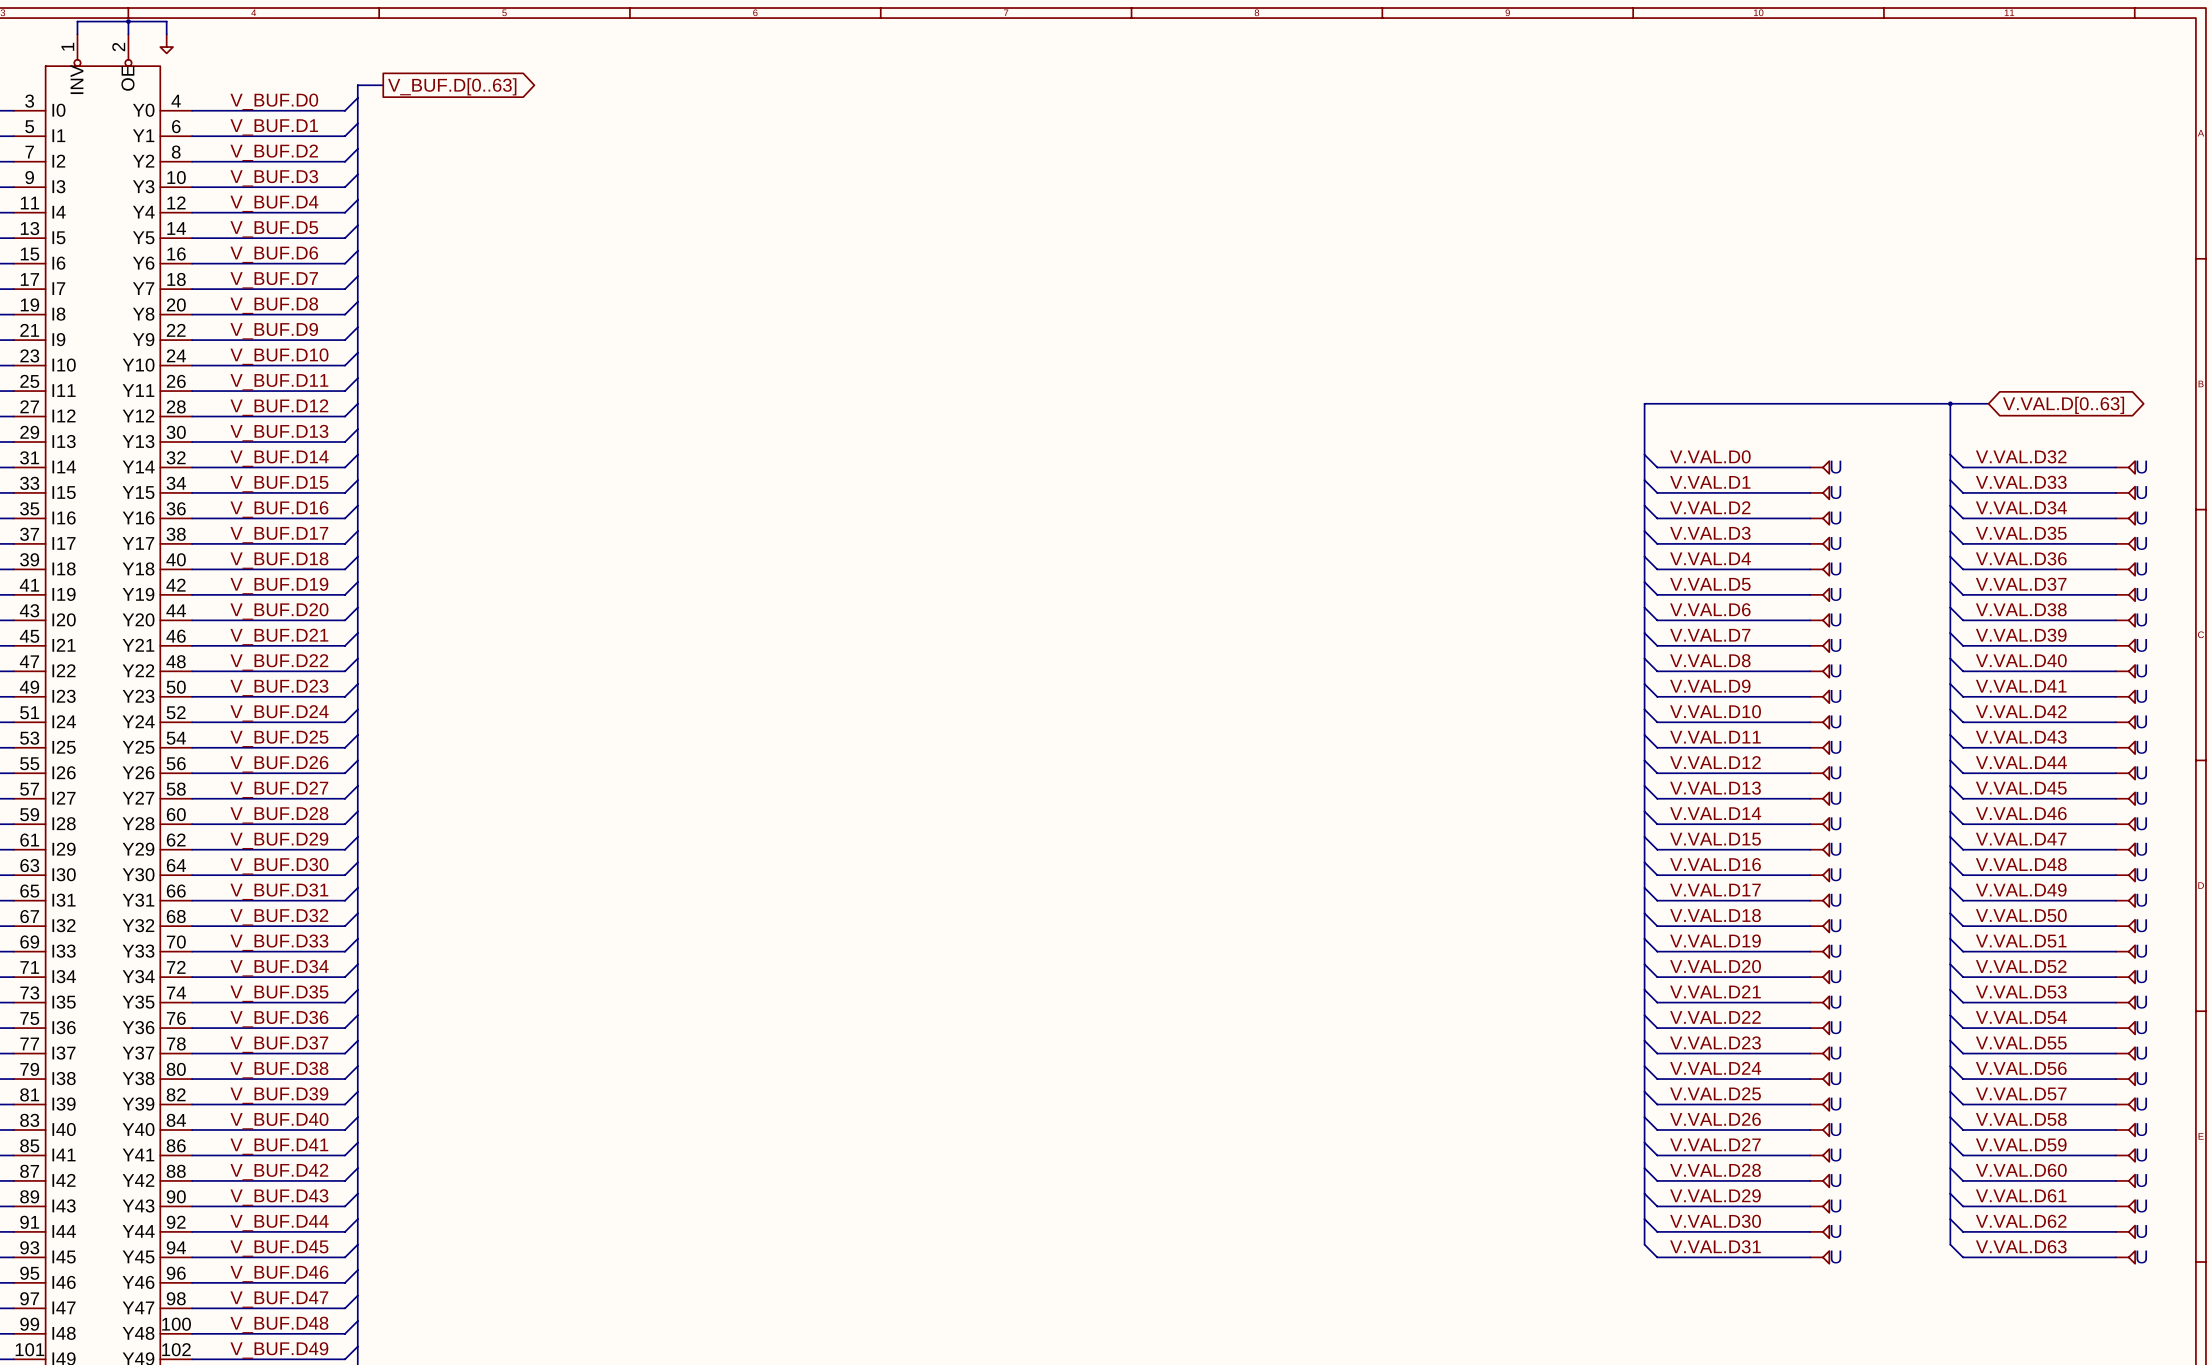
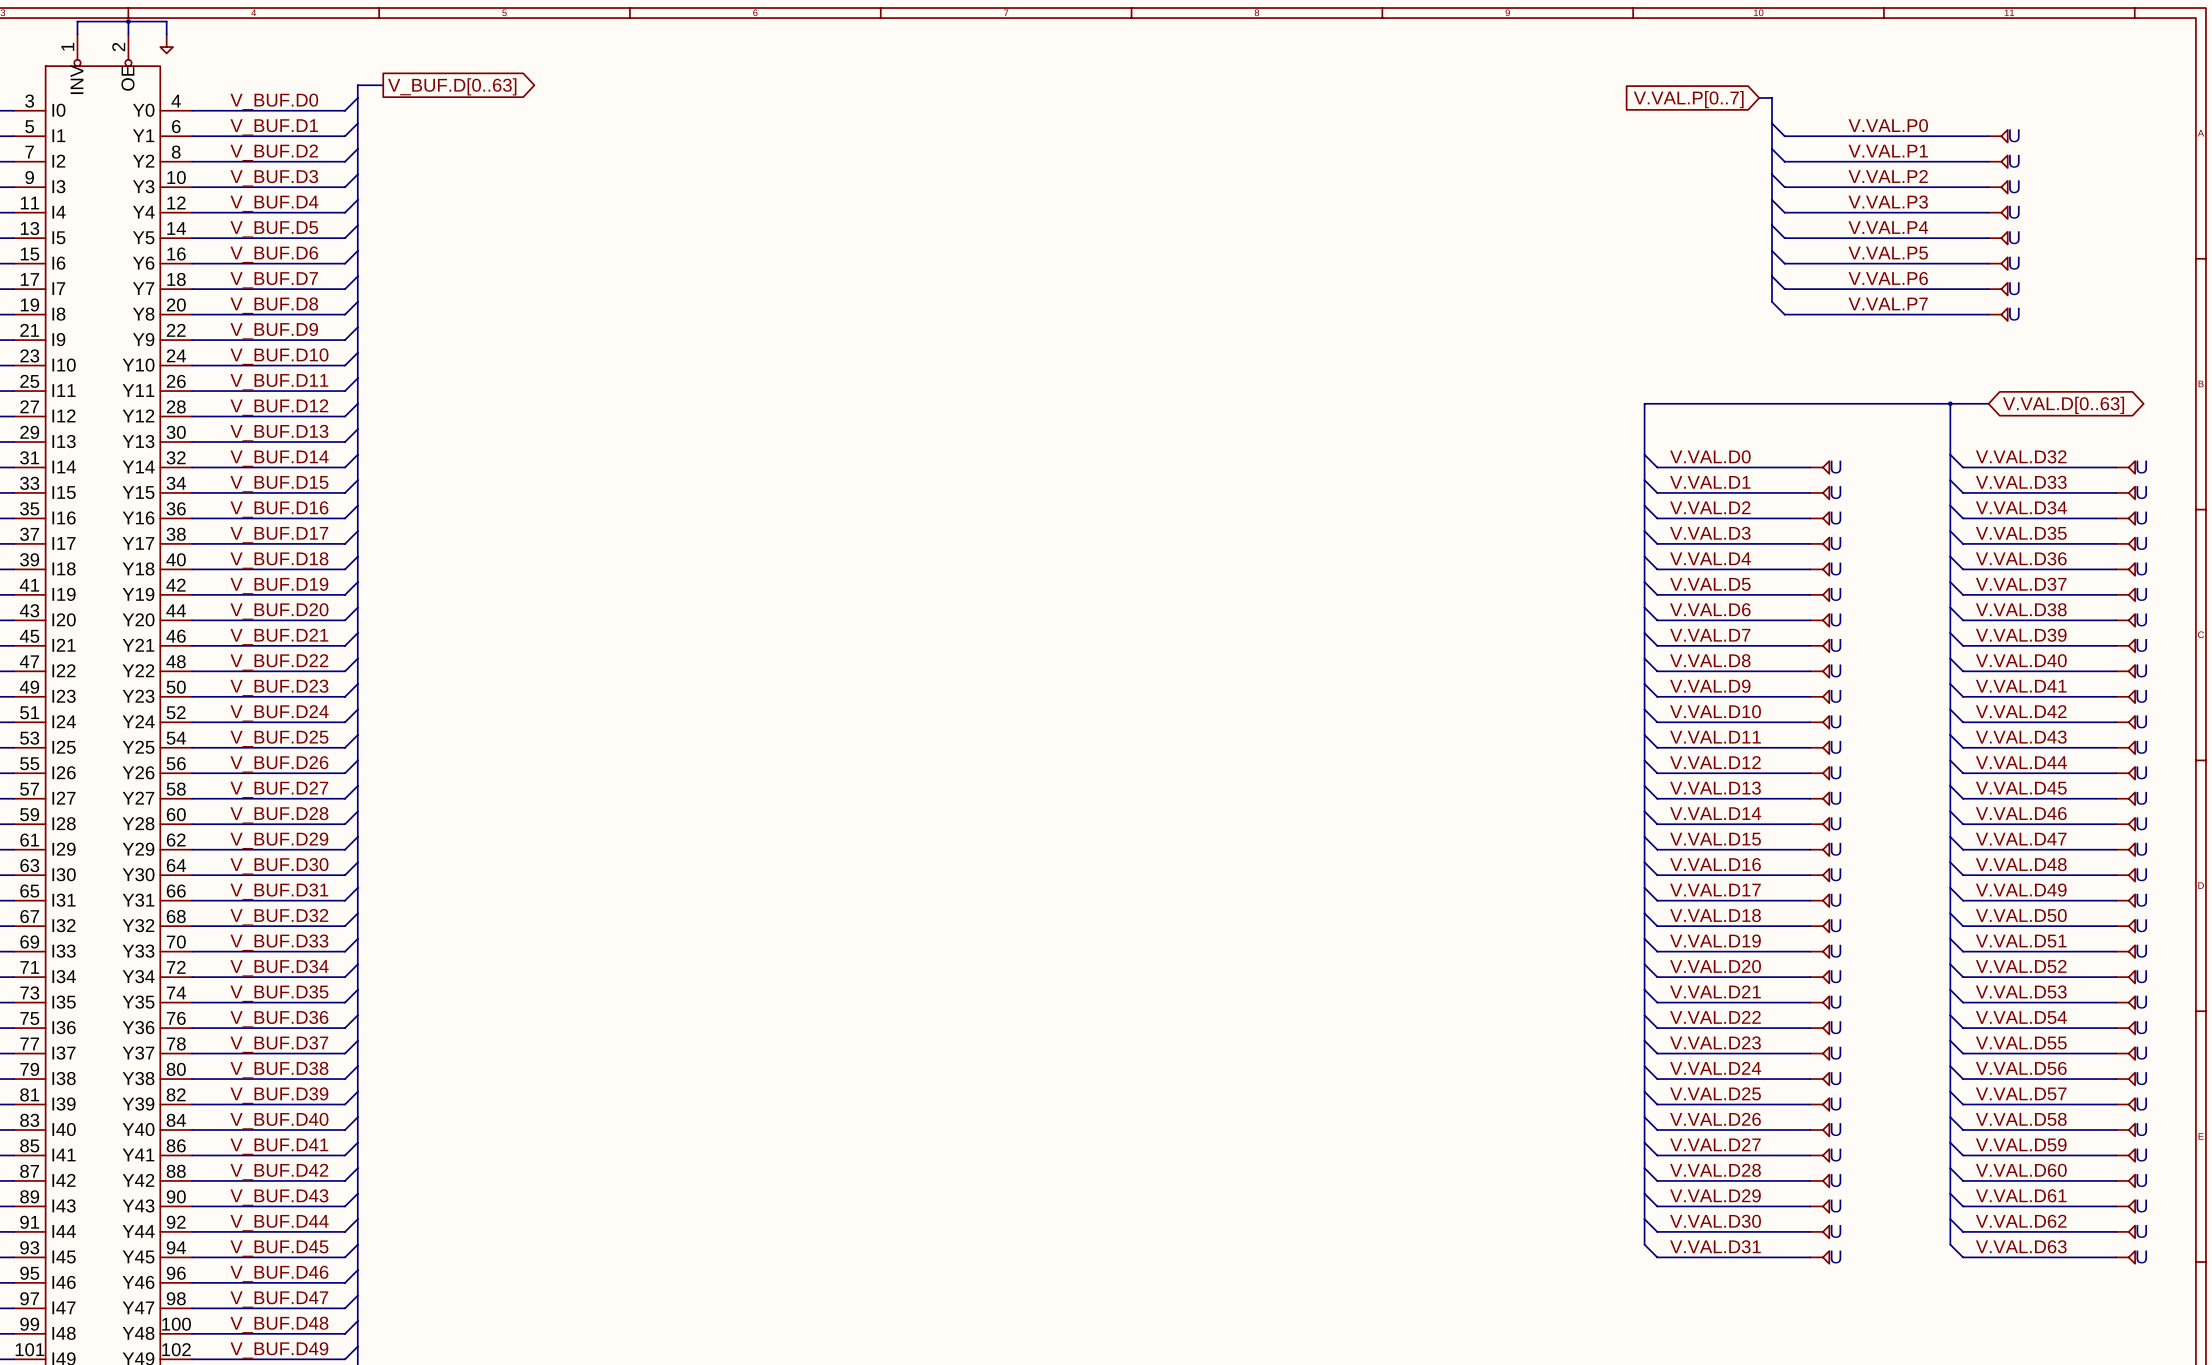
bus: none -> (1759, 98) (1771, 98) (1771, 301)
global label: none -> V.VAL.P[0..7] (1688, 99)
wire: none -> (1771, 123) (1784, 136) (1988, 136)
label: none -> V.VAL.P0 (1888, 125)
U: none -> (1998, 136)
wire: none -> (1771, 148) (1784, 161) (1988, 161)
label: none -> V.VAL.P1 (1888, 151)
U: none -> (1998, 161)
wire: none -> (1771, 174) (1784, 187) (1988, 187)
label: none -> V.VAL.P2 (1888, 176)
U: none -> (1998, 187)
wire: none -> (1771, 199) (1784, 212) (1988, 212)
label: none -> V.VAL.P3 (1888, 202)
U: none -> (1998, 212)
wire: none -> (1771, 225) (1784, 238) (1988, 238)
label: none -> V.VAL.P4 (1888, 227)
U: none -> (1998, 238)
wire: none -> (1771, 250) (1784, 263) (1988, 263)
label: none -> V.VAL.P5 (1888, 253)
U: none -> (1998, 263)
wire: none -> (1771, 276) (1784, 289) (1988, 289)
label: none -> V.VAL.P6 (1888, 278)
U: none -> (1998, 289)
wire: none -> (1771, 301) (1784, 314) (1988, 314)
label: none -> V.VAL.P7 (1888, 303)
U: none -> (1998, 314)

